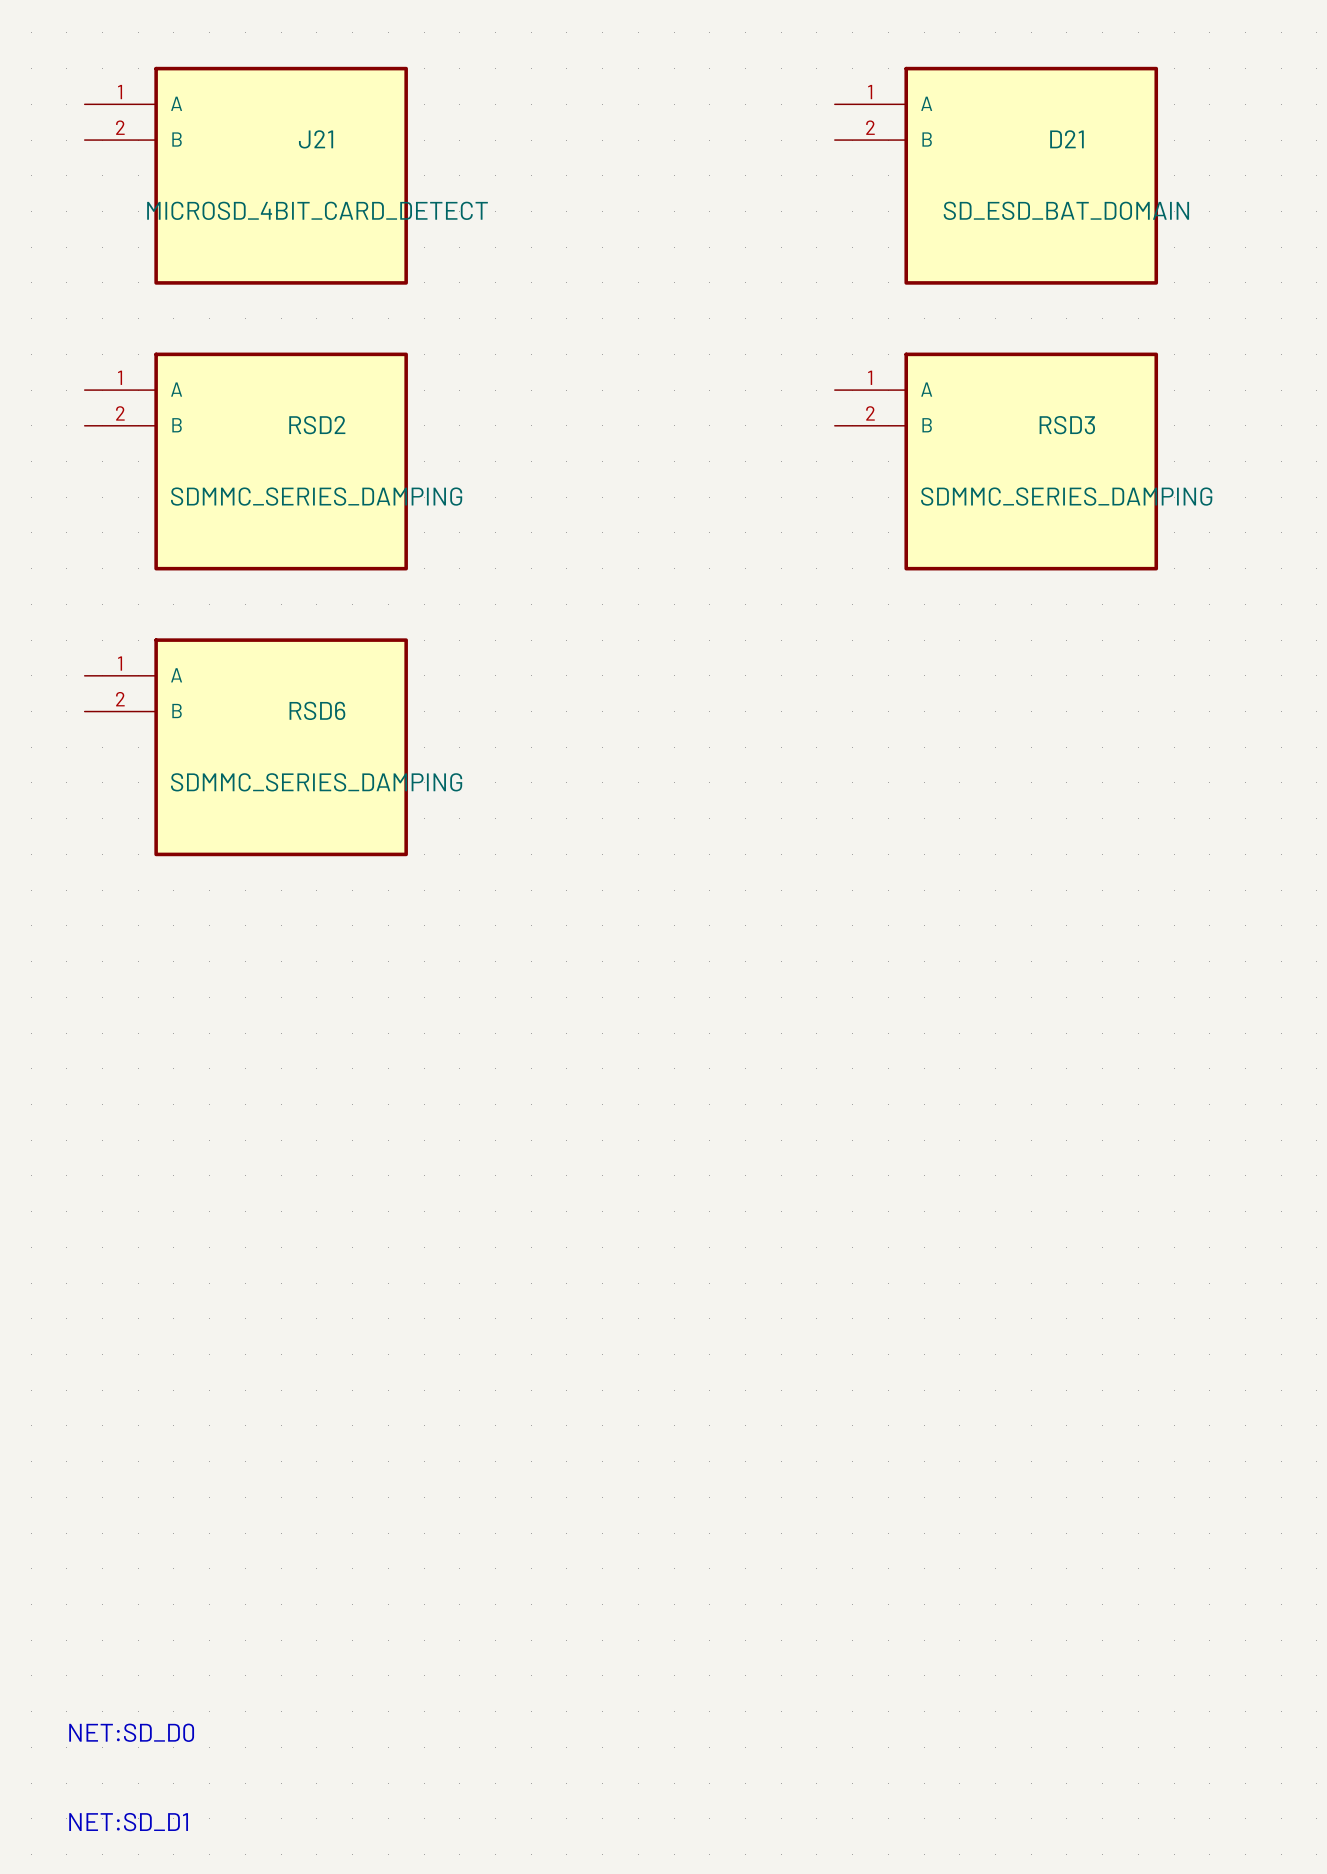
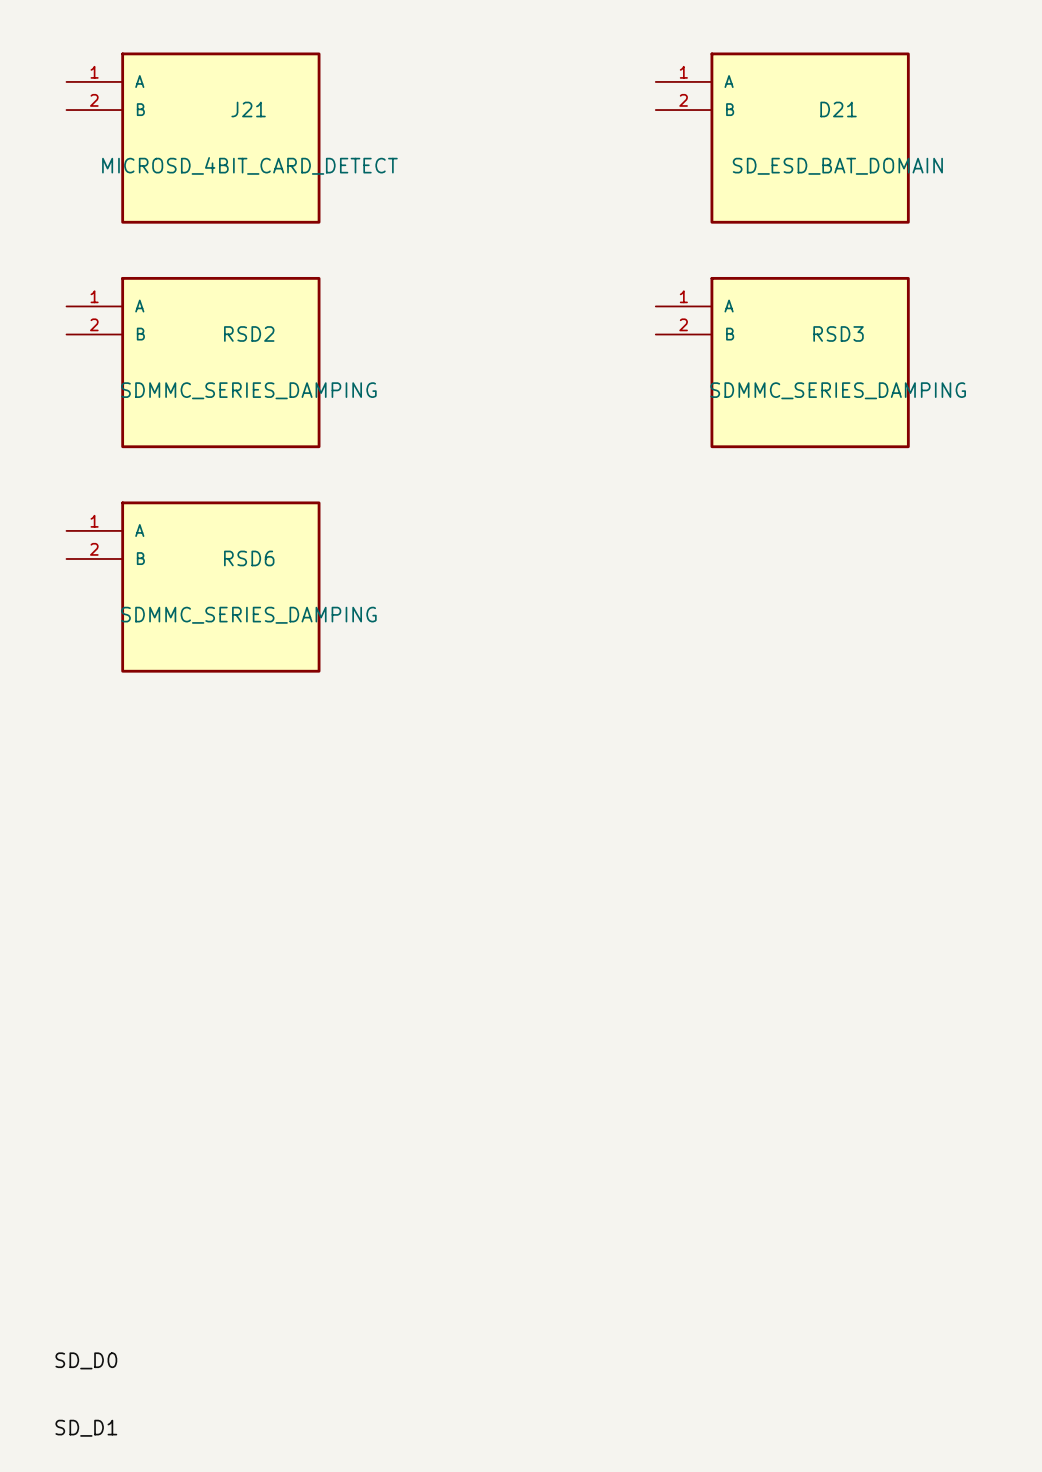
label: none -> SD_D0 (86, 1360)
text: NET:SD_D0 (131, 1732) -> none
label: none -> SD_D1 (86, 1428)
text: NET:SD_D1 (128, 1822) -> none

